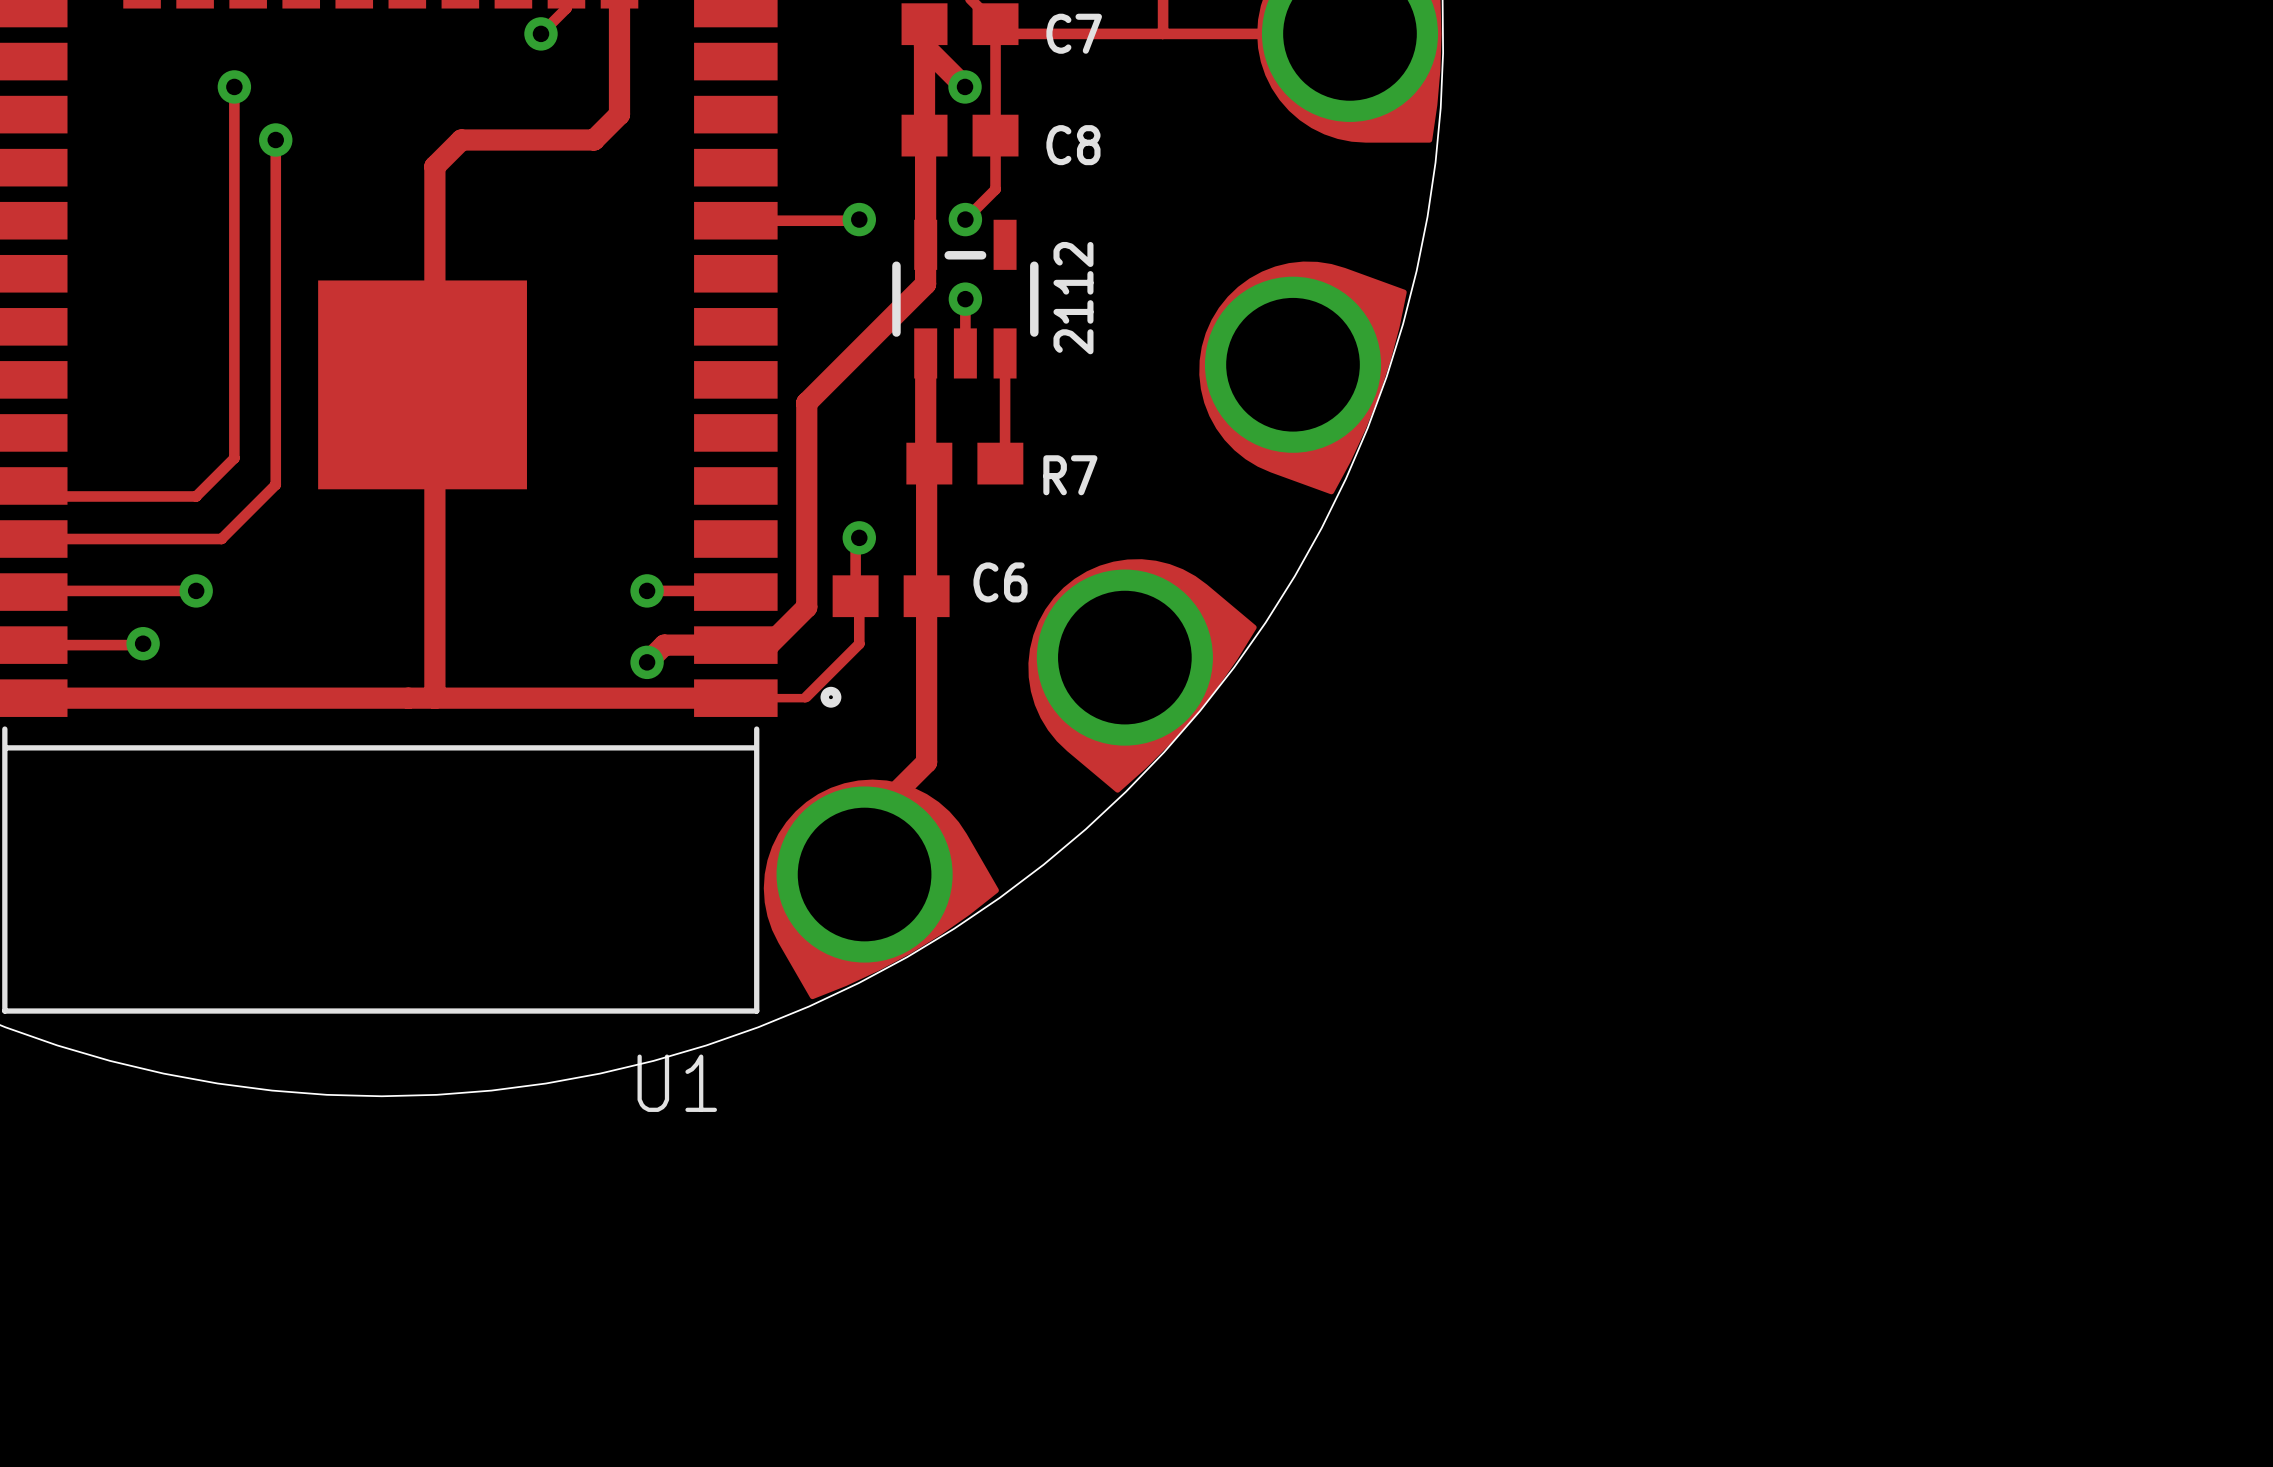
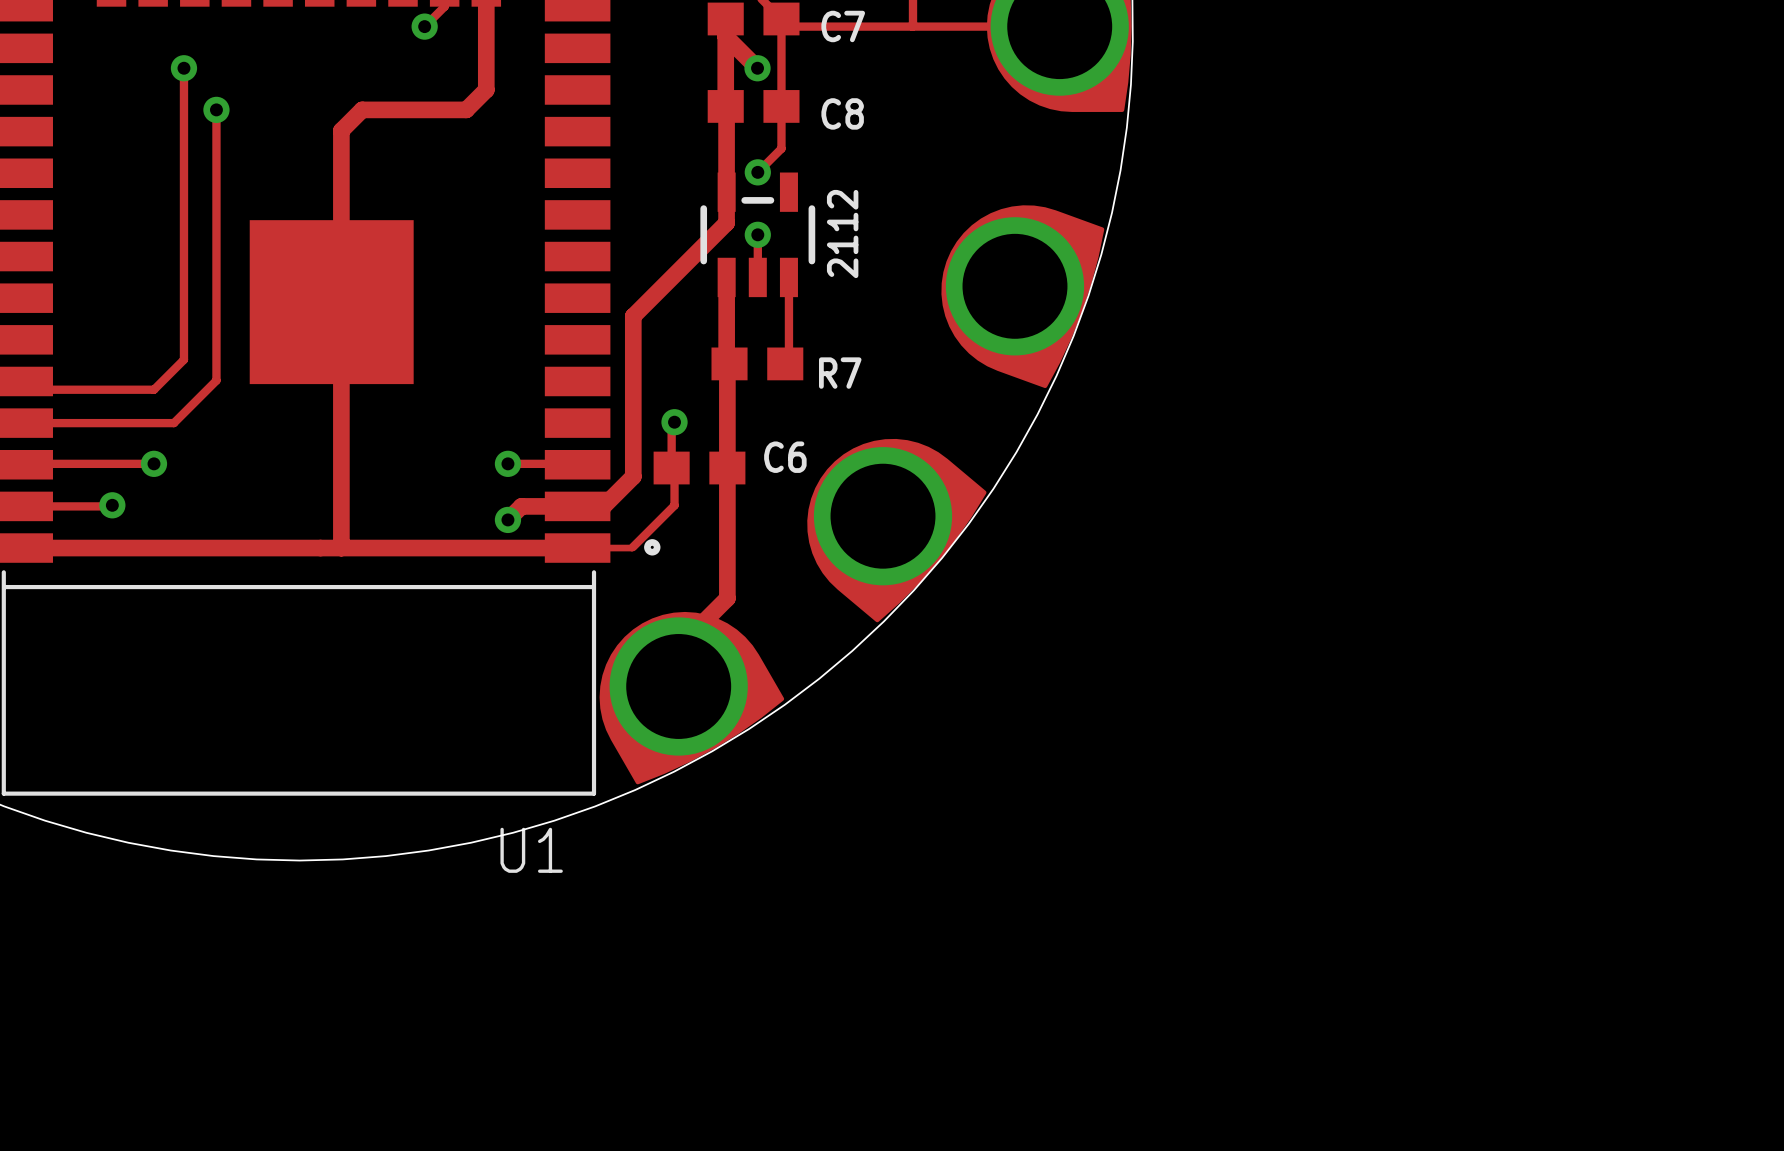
track: (859, 219) (735, 220) -> none
via: (859, 219) -> none

